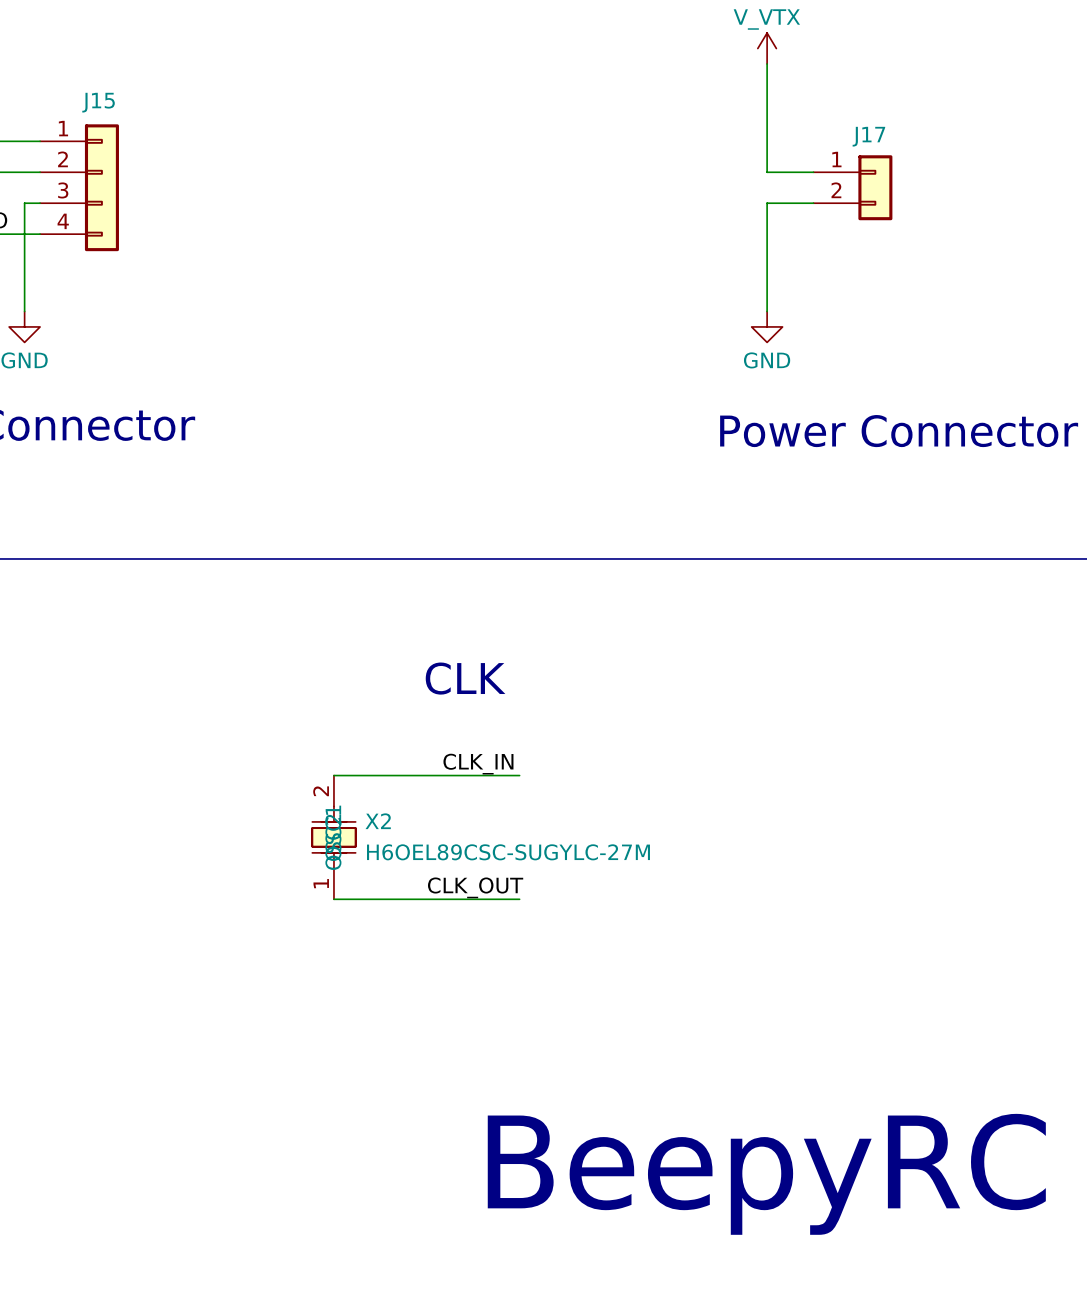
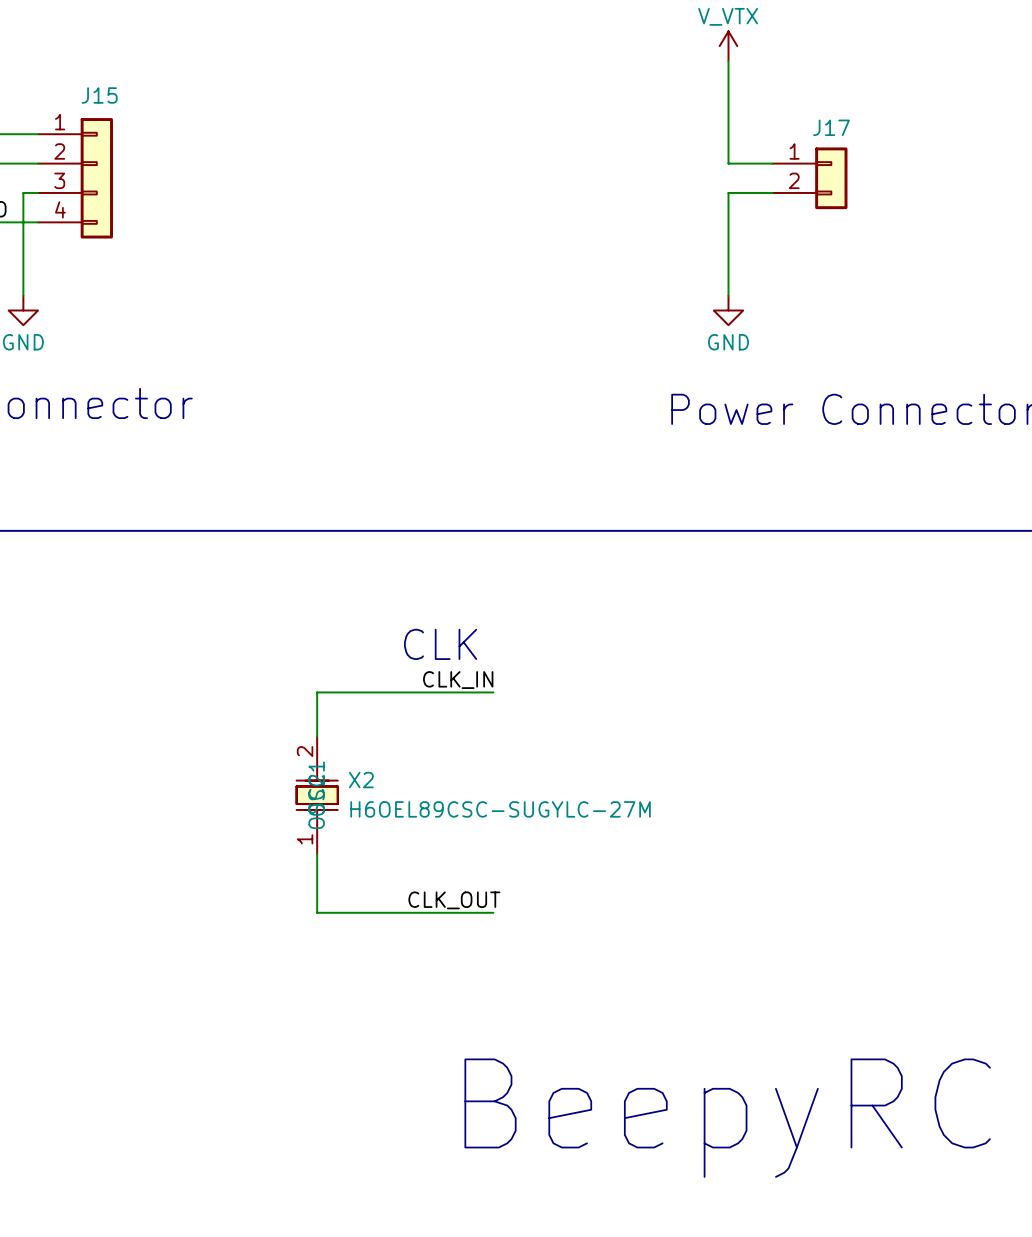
label position: CLK_IN (478, 764) -> CLK_IN (458, 680)
wire: (333, 775) (519, 775) -> (317, 736) (317, 692) (493, 692)
label position: CLK_OUT (475, 887) -> CLK_OUT (454, 900)
wire: (333, 899) (519, 899) -> (317, 854) (317, 912) (493, 912)

